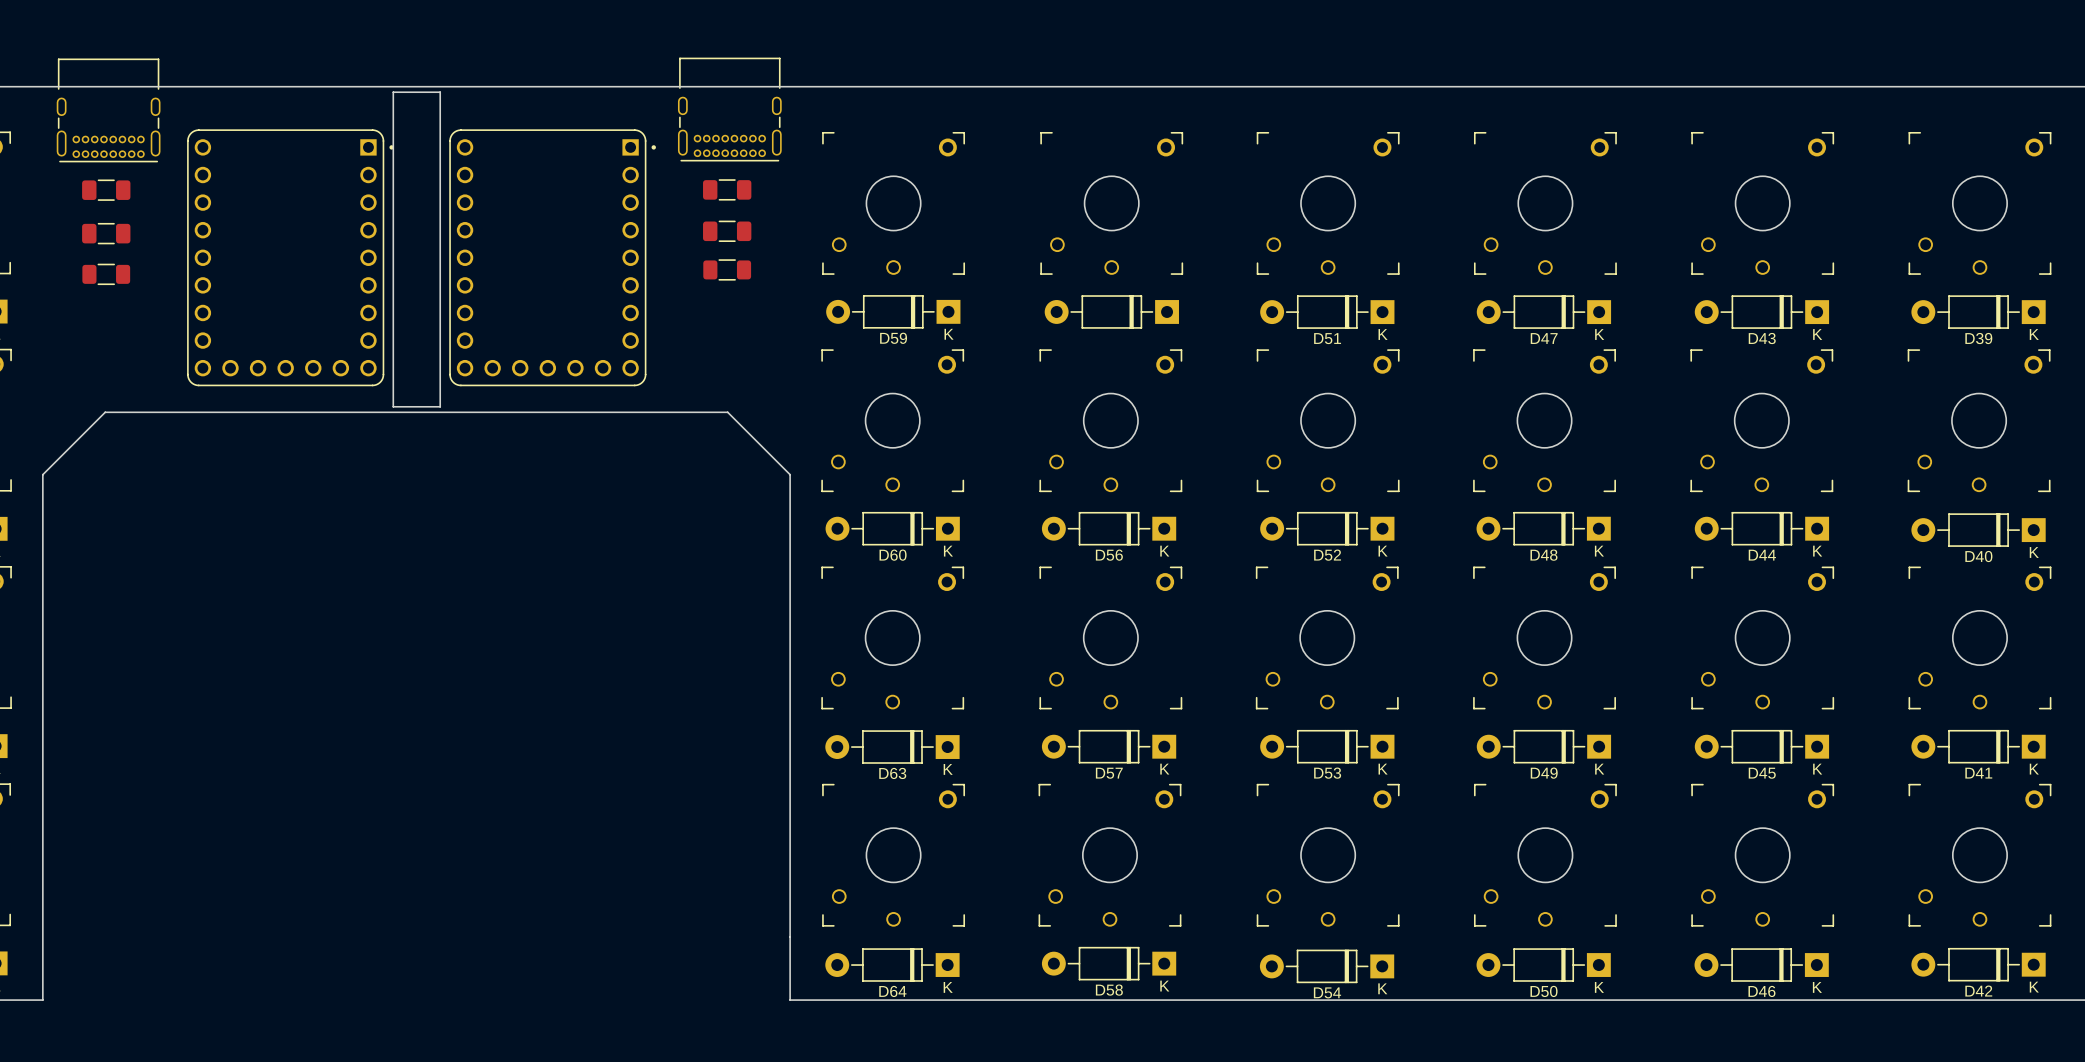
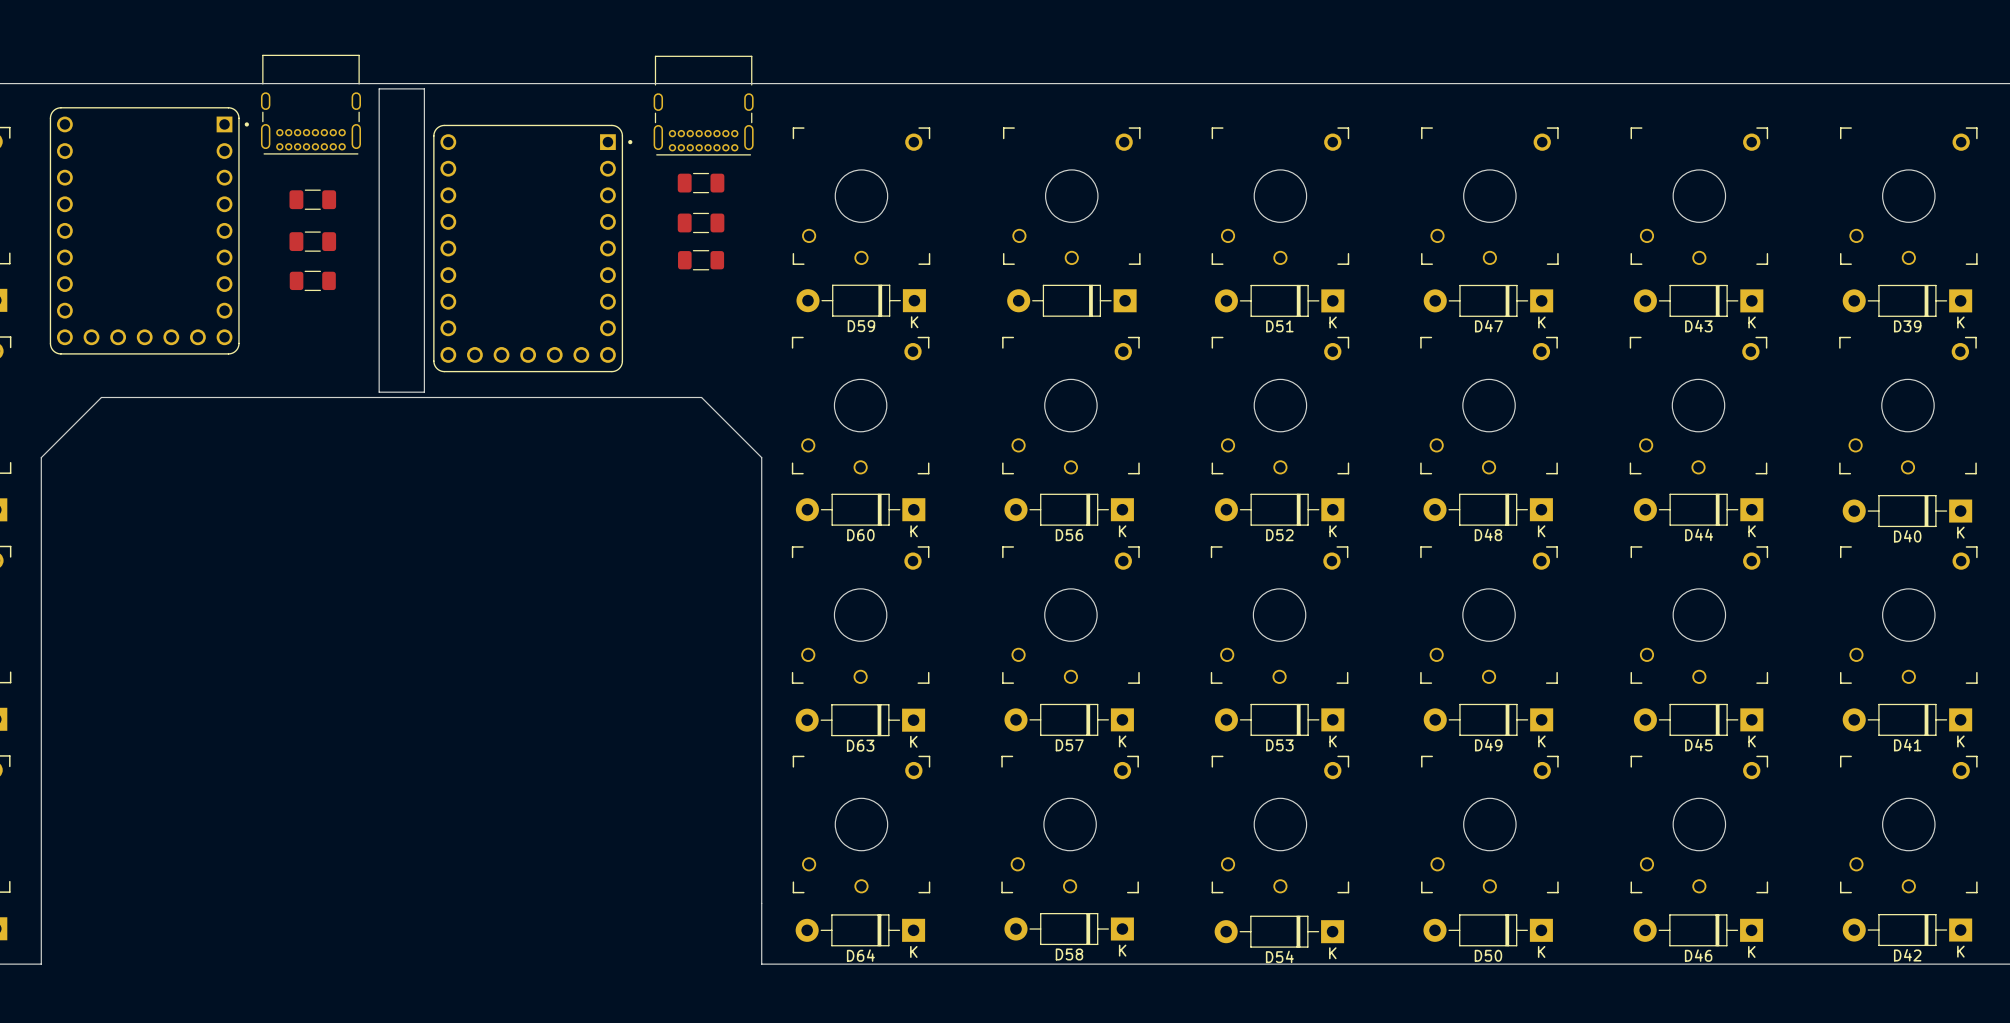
part position: (108, 110) -> (310, 104)
part: (106, 190) -> none
part: none -> (312, 199)
part: (106, 233) -> none
part: none -> (312, 241)
part position: (290, 257) -> (149, 230)
part position: (106, 274) -> (312, 280)

